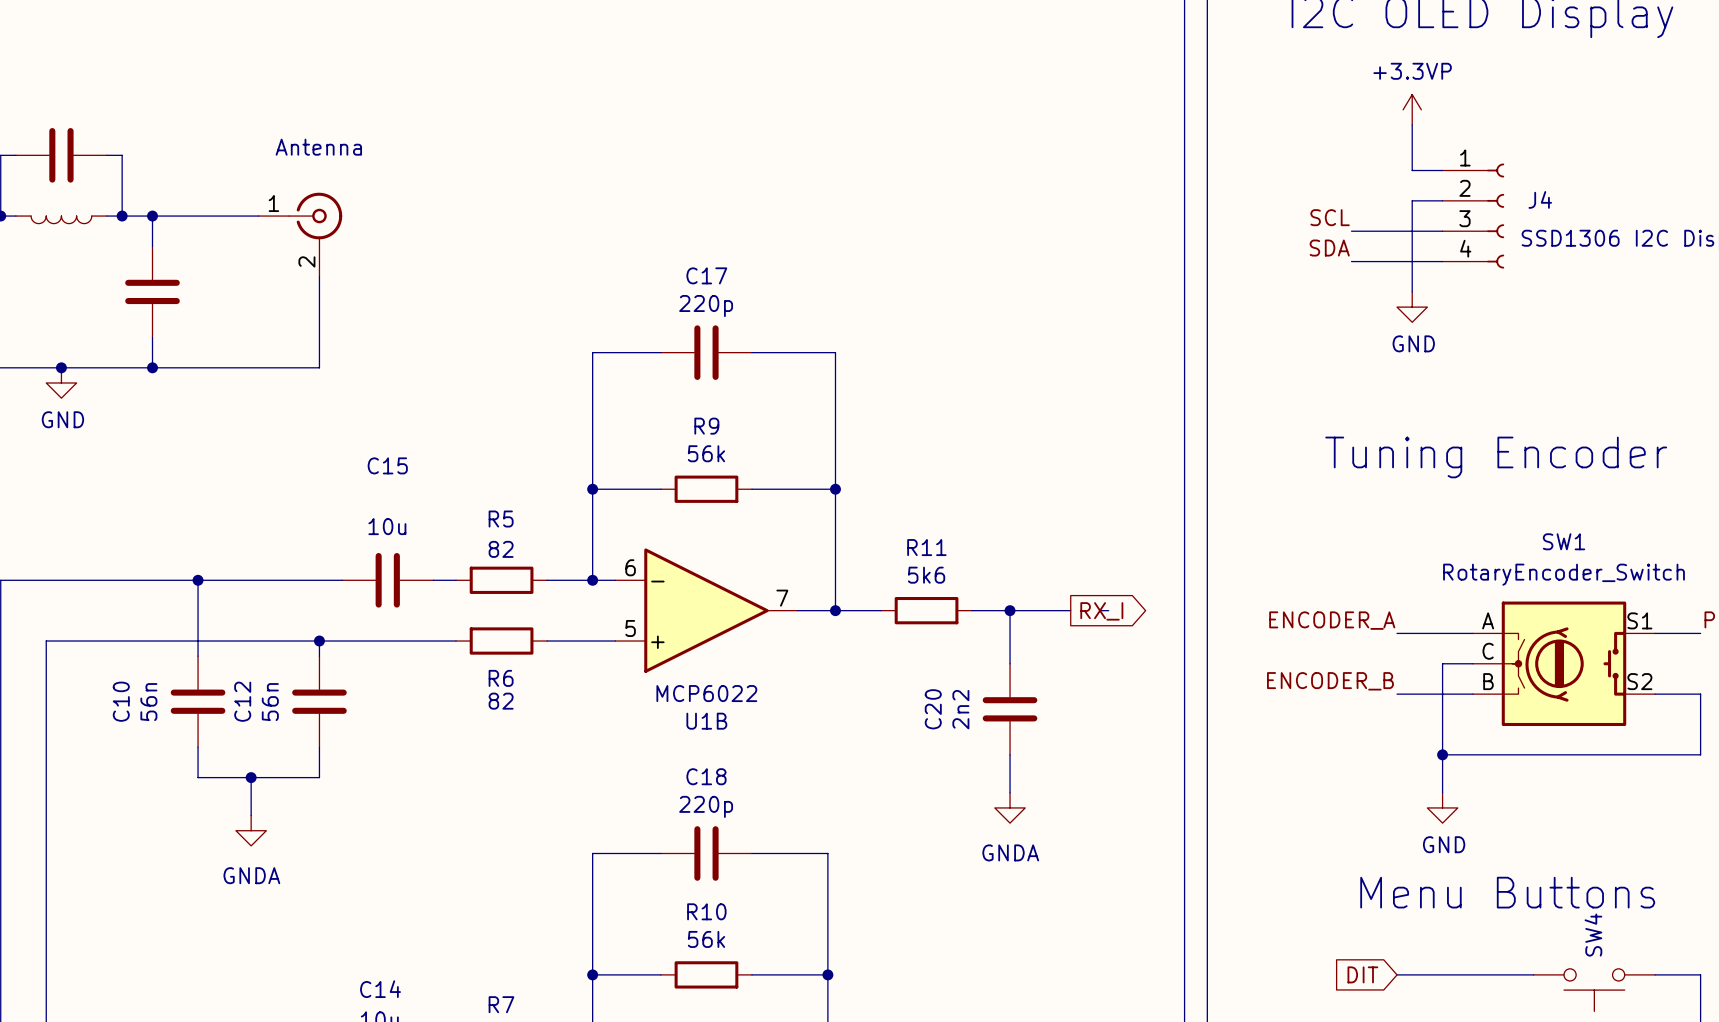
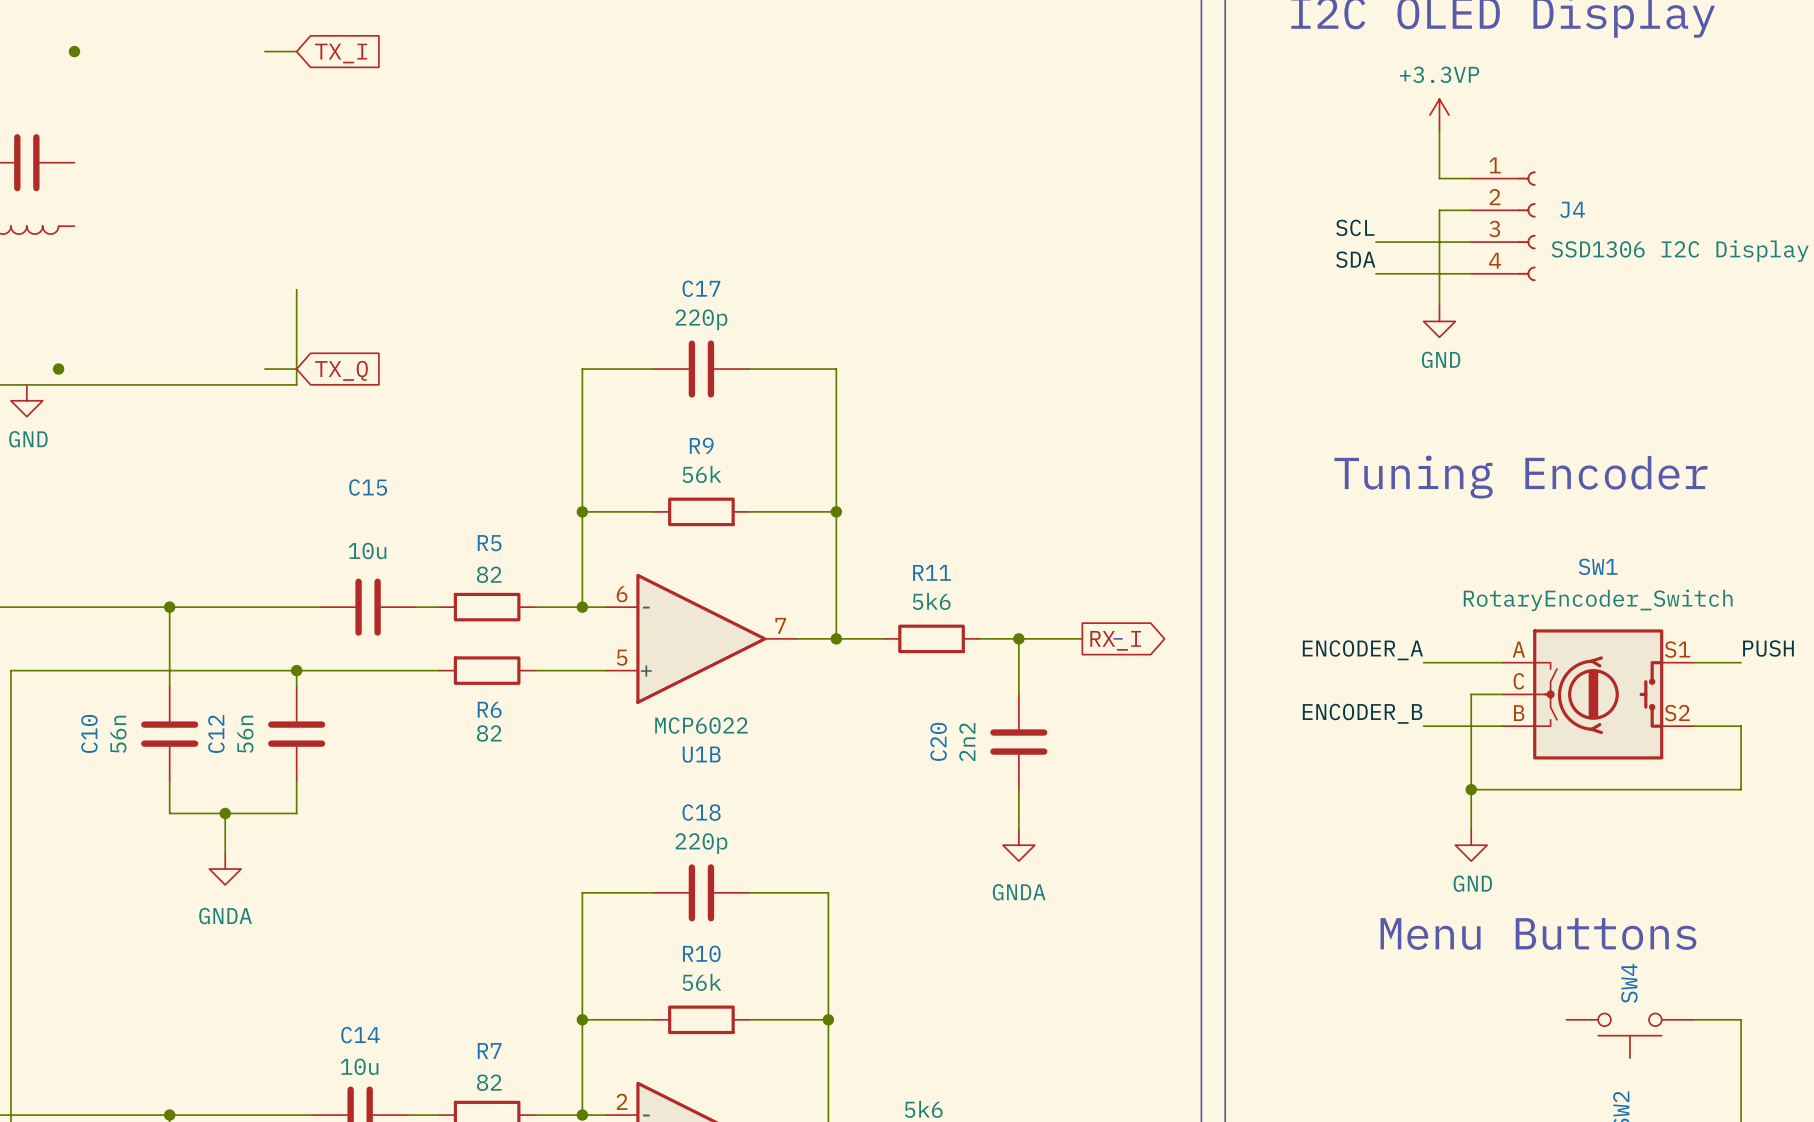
junction: none -> (74, 51)
wire: none -> (264, 51) (296, 51)
global label: none -> TX_I (341, 53)
wire: (106, 155) (122, 155) (122, 216) -> none
wire: (106, 216) (258, 216) -> none
junction: (122, 216) -> none
wire: (152, 216) (152, 246) -> none
junction: (152, 216) -> none
part: Antenna (300, 234) -> none
part: (152, 291) -> none
wire: (152, 337) (152, 367) -> none
junction: none -> (58, 369)
wire: none -> (264, 369) (296, 369)
global label: none -> TX_Q (341, 370)
junction: (61, 367) -> none
junction: (152, 367) -> none
global label: DIT (1362, 974) -> none
wire: (1397, 974) (1533, 974) -> none

